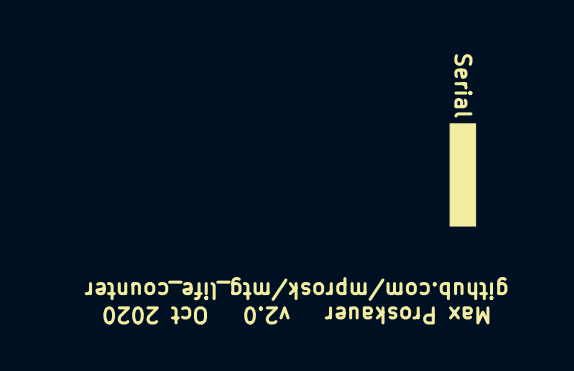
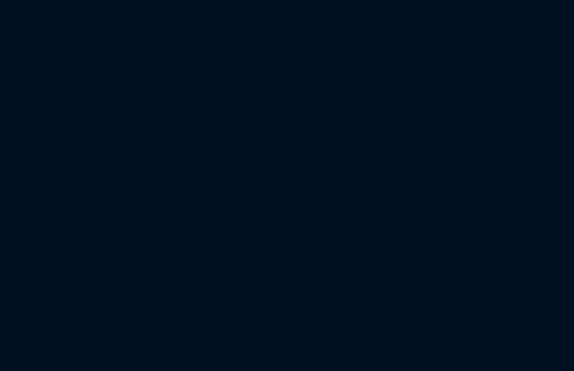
text: Serial (463, 85) -> none
drawing: [449, 123, 477, 227] -> none
text: github.com/mprosk/mtg_life_counter (296, 288) -> none
text: Max Proskauer v2.0 Oct 2020 (296, 315) -> none

